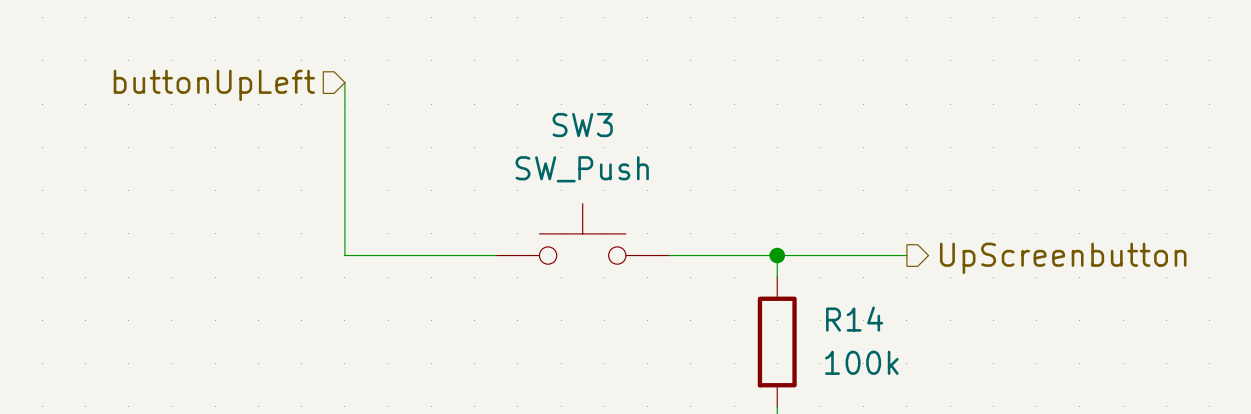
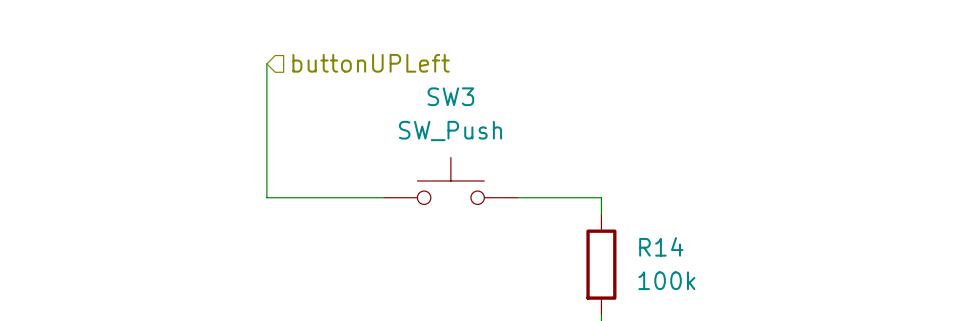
hierarchical label: none -> buttonUPLeft (371, 63)
hierarchical label: buttonUpLeft (214, 85) -> none
wire: (777, 255) (906, 255) -> none
junction: (777, 255) -> none
hierarchical label: UpScreenbutton (1063, 258) -> none

